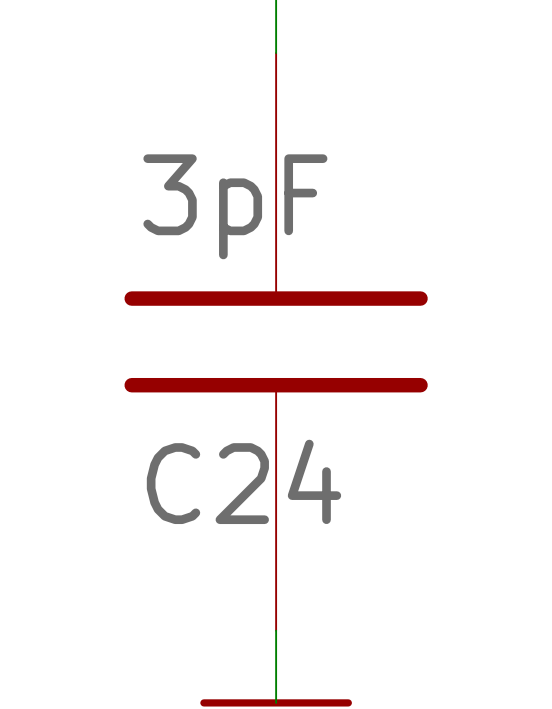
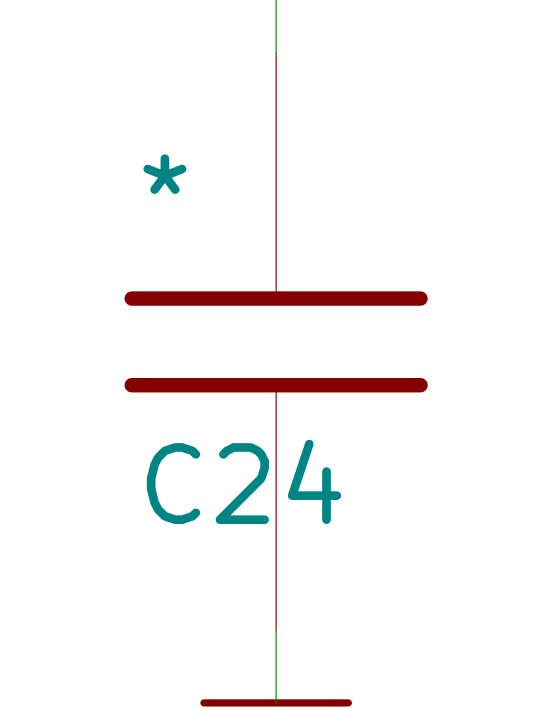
C24 value: 3pF (235, 206) -> * (164, 174)

